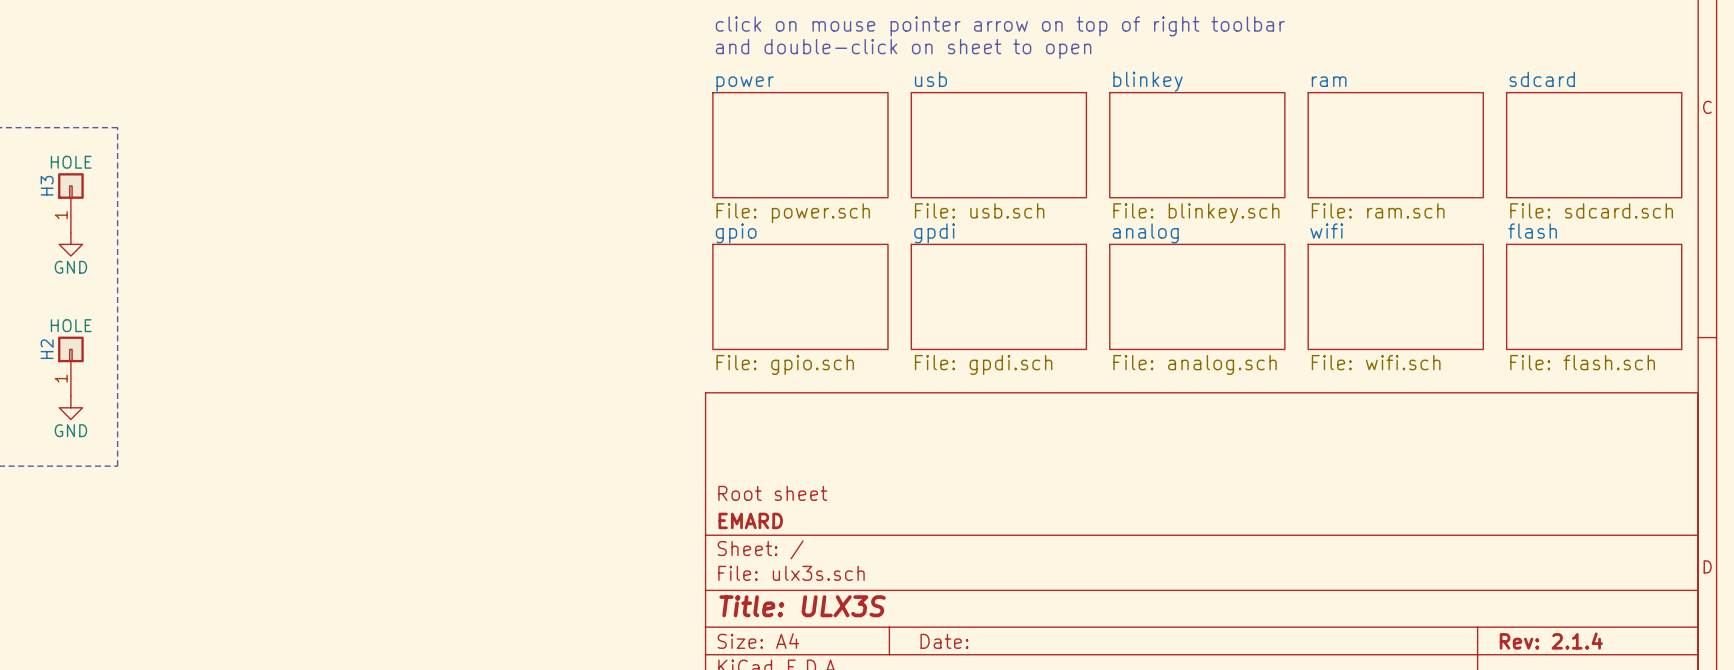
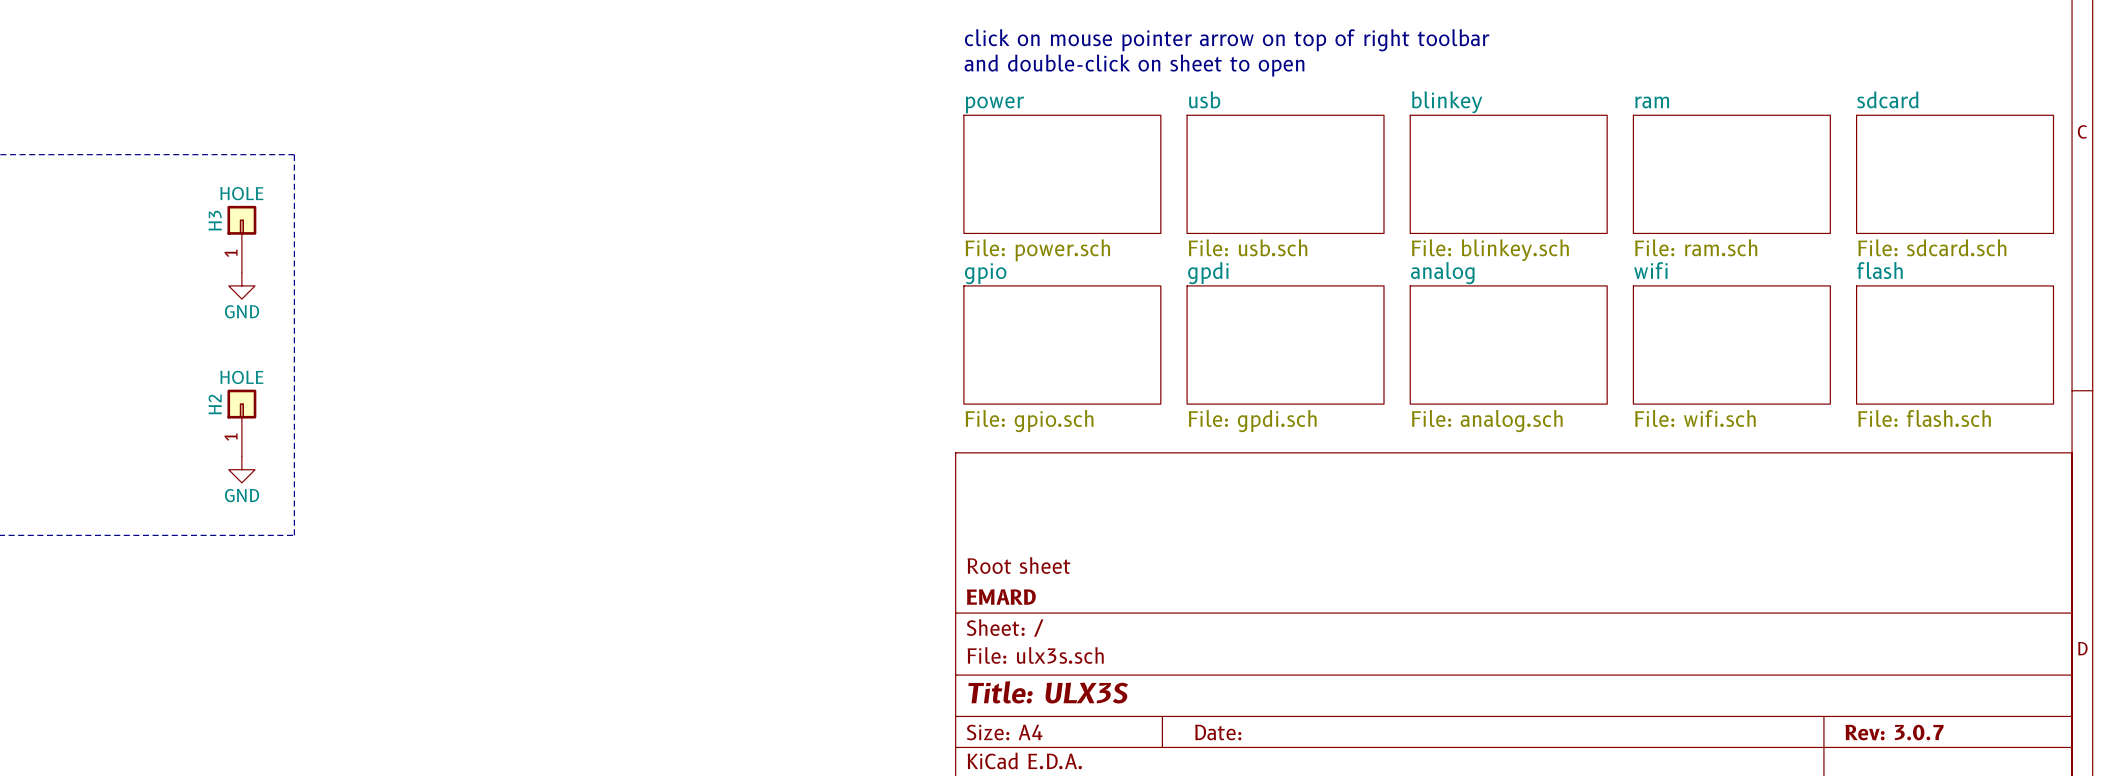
title block: Rev: 2.1.4 (1551, 641) -> Rev: 3.0.7 (1894, 732)

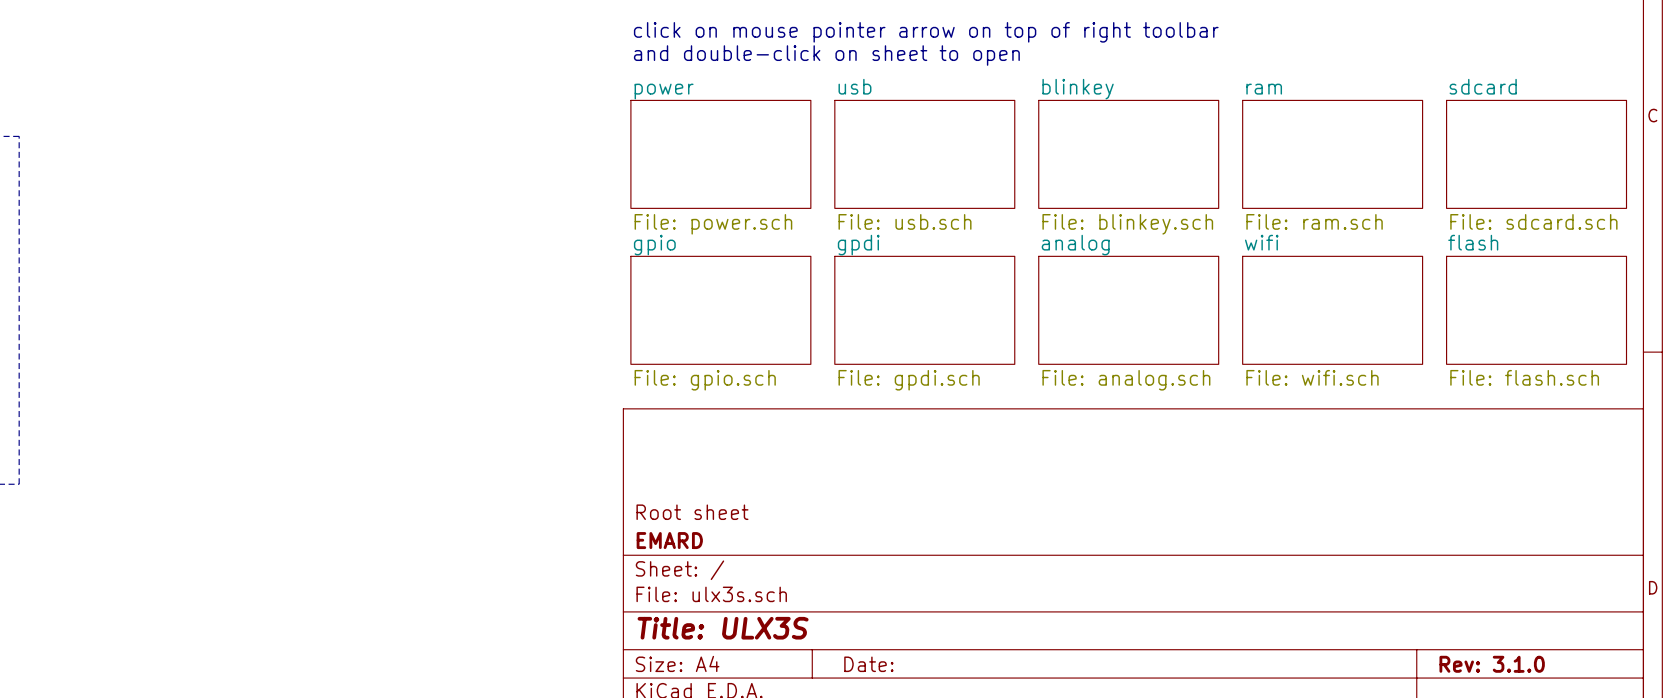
title block: Rev: 3.0.7 (1894, 732) -> Rev: 3.1.0 (1492, 664)

